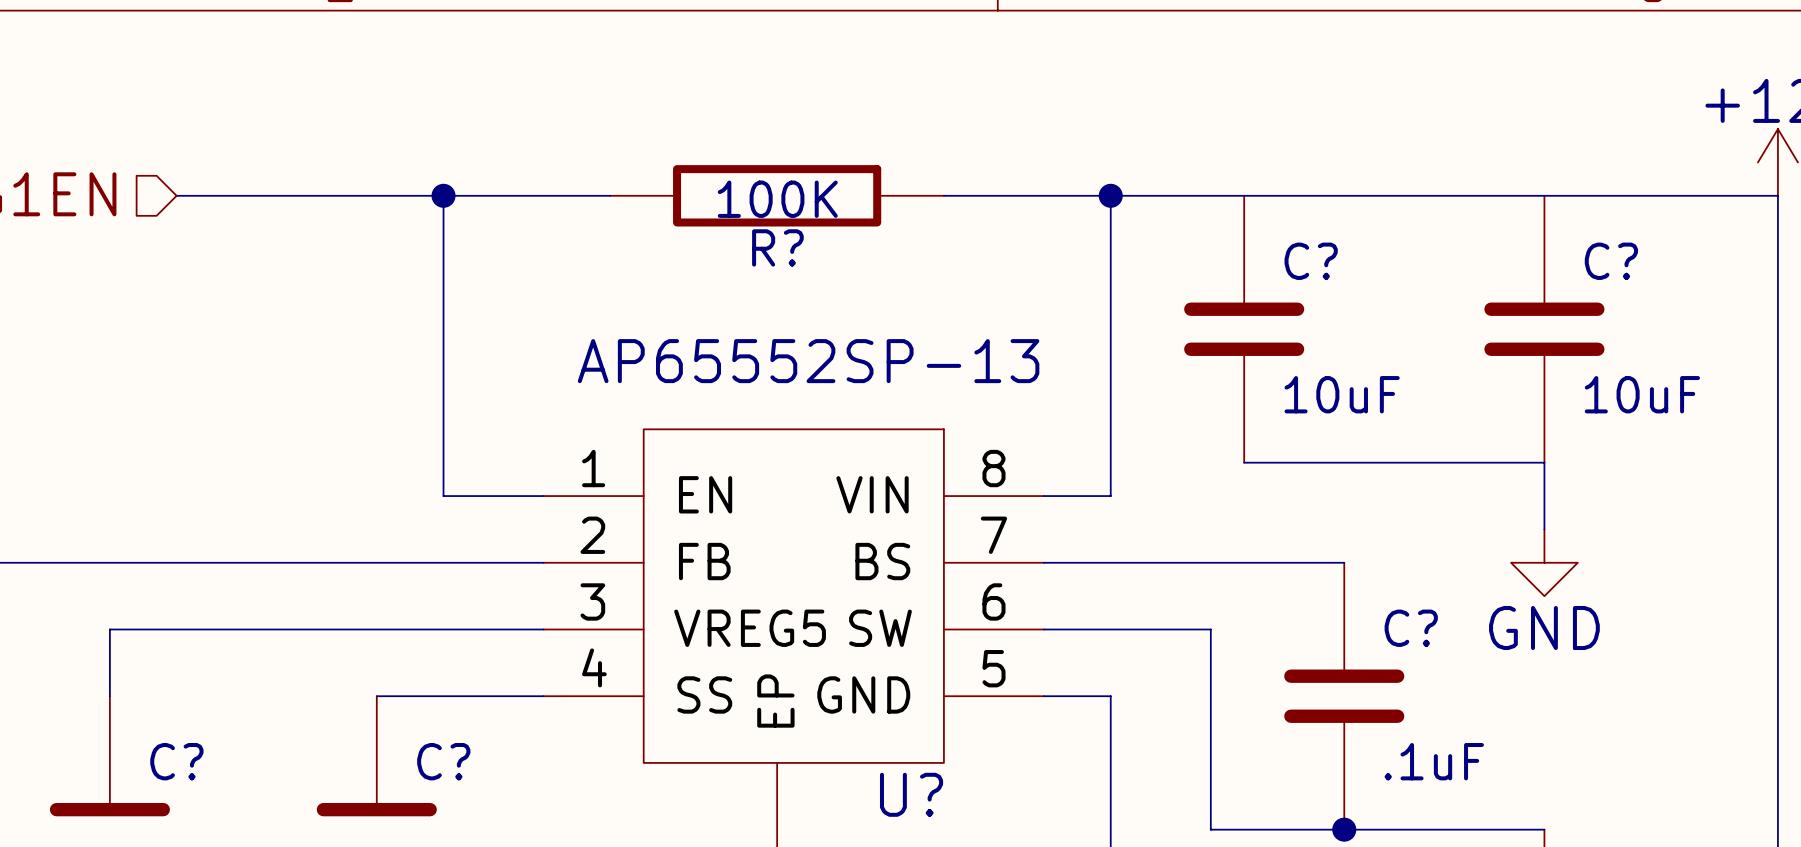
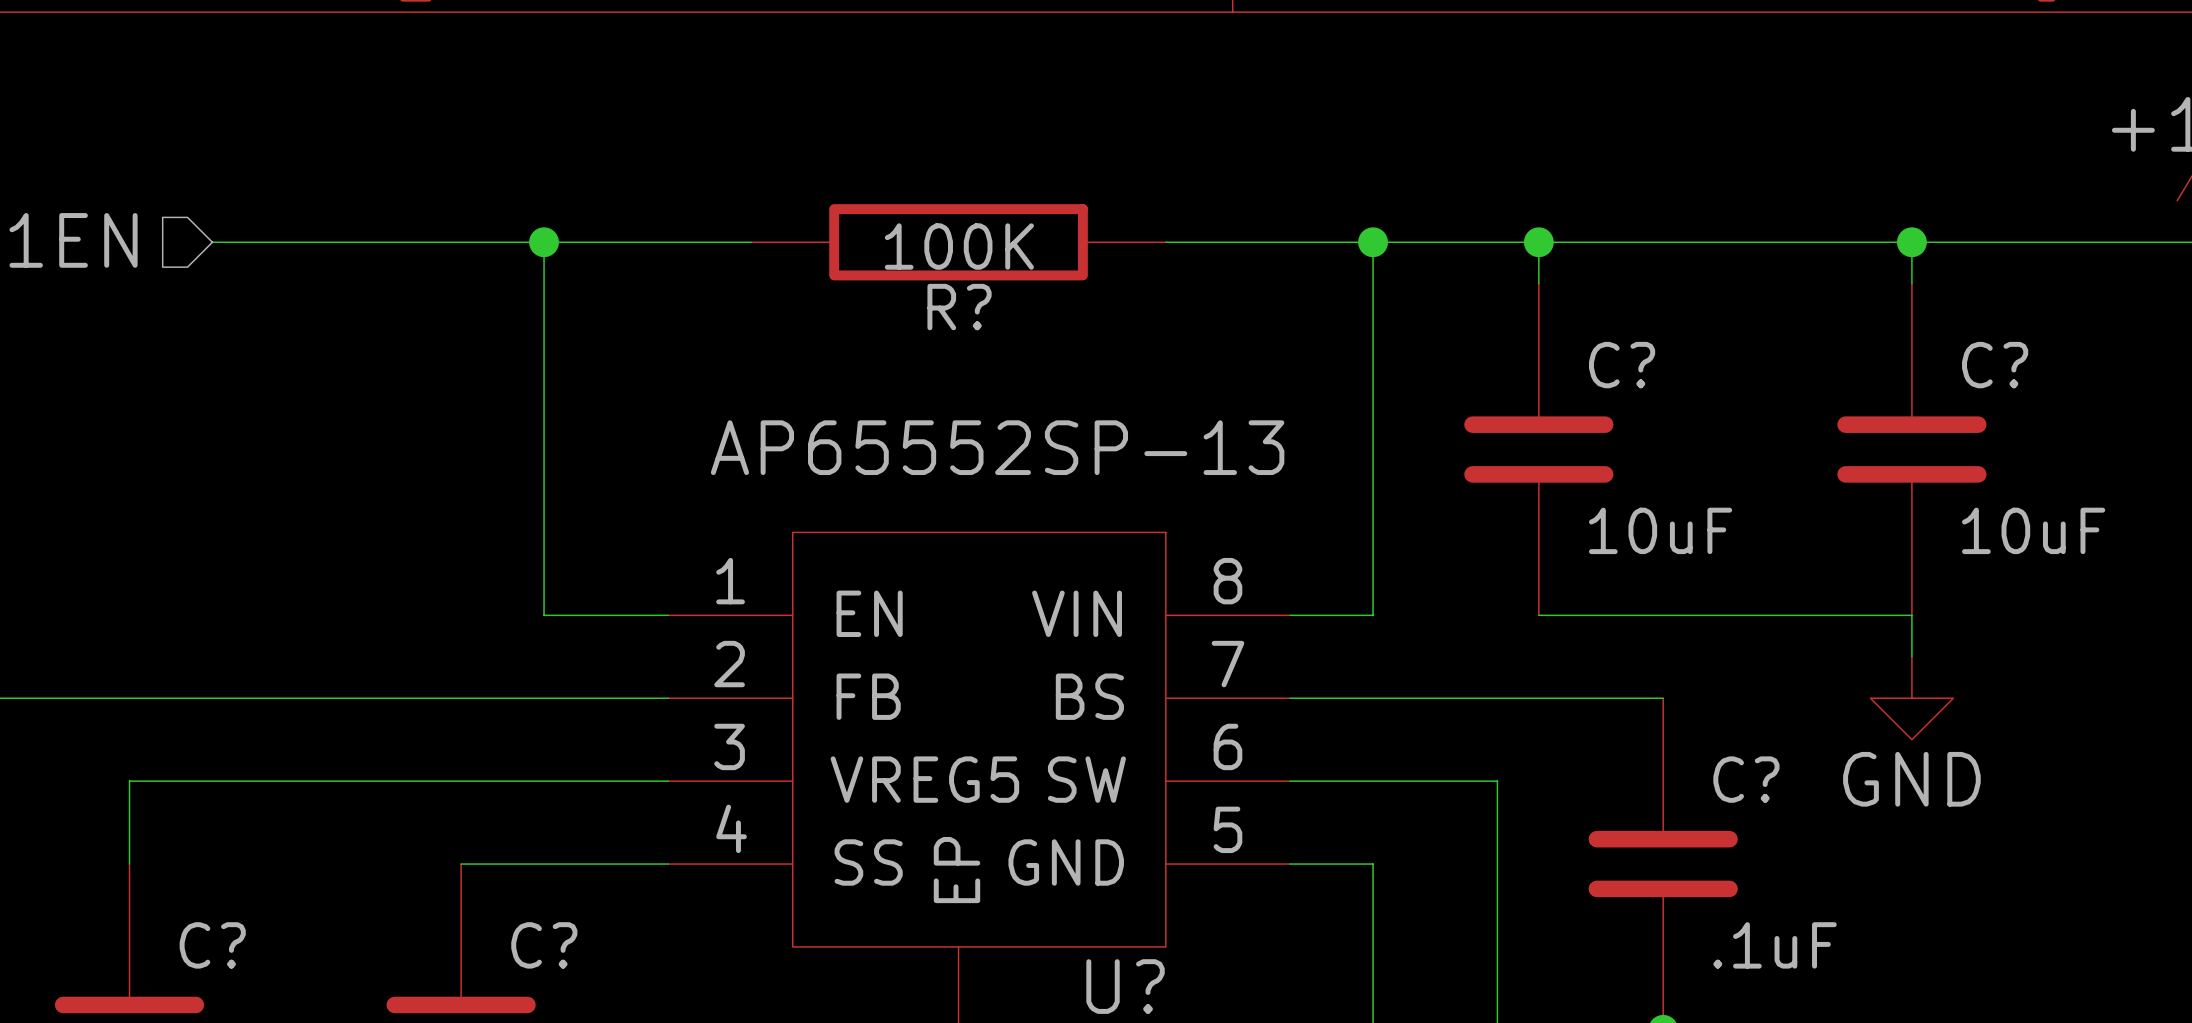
junction: none -> (1538, 242)
junction: none -> (1911, 242)
C? position: (1244, 329) -> (1538, 449)
C? position: (1544, 329) -> (1911, 449)
wire: (1244, 462) (1544, 462) (1544, 496) -> (1538, 615) (1911, 615)

